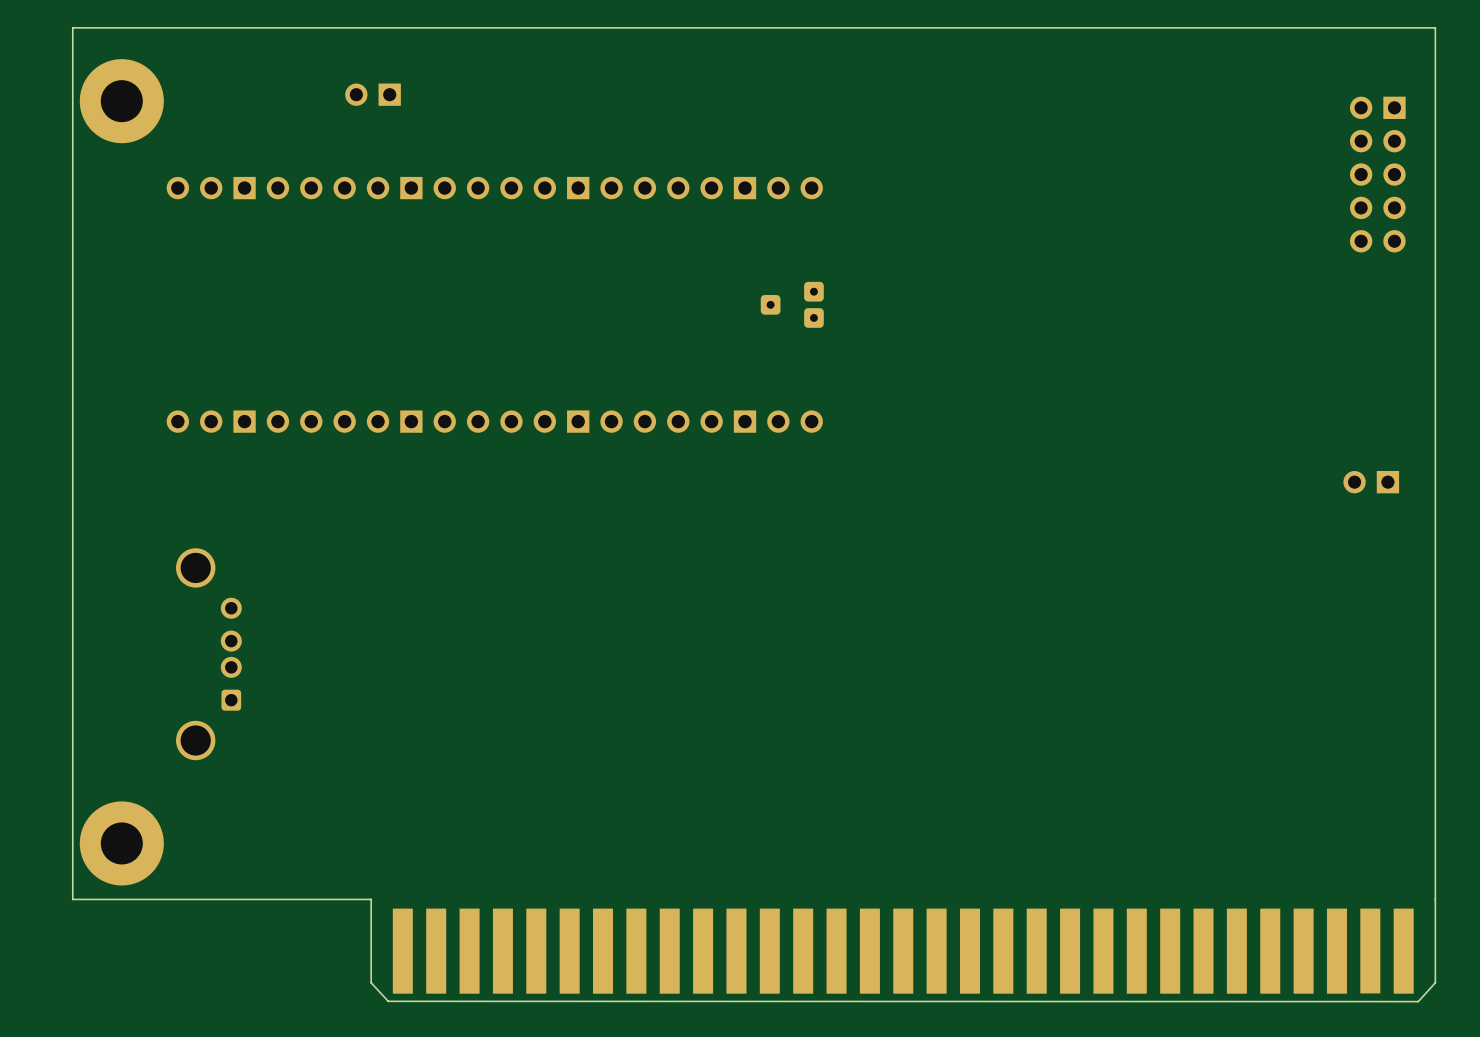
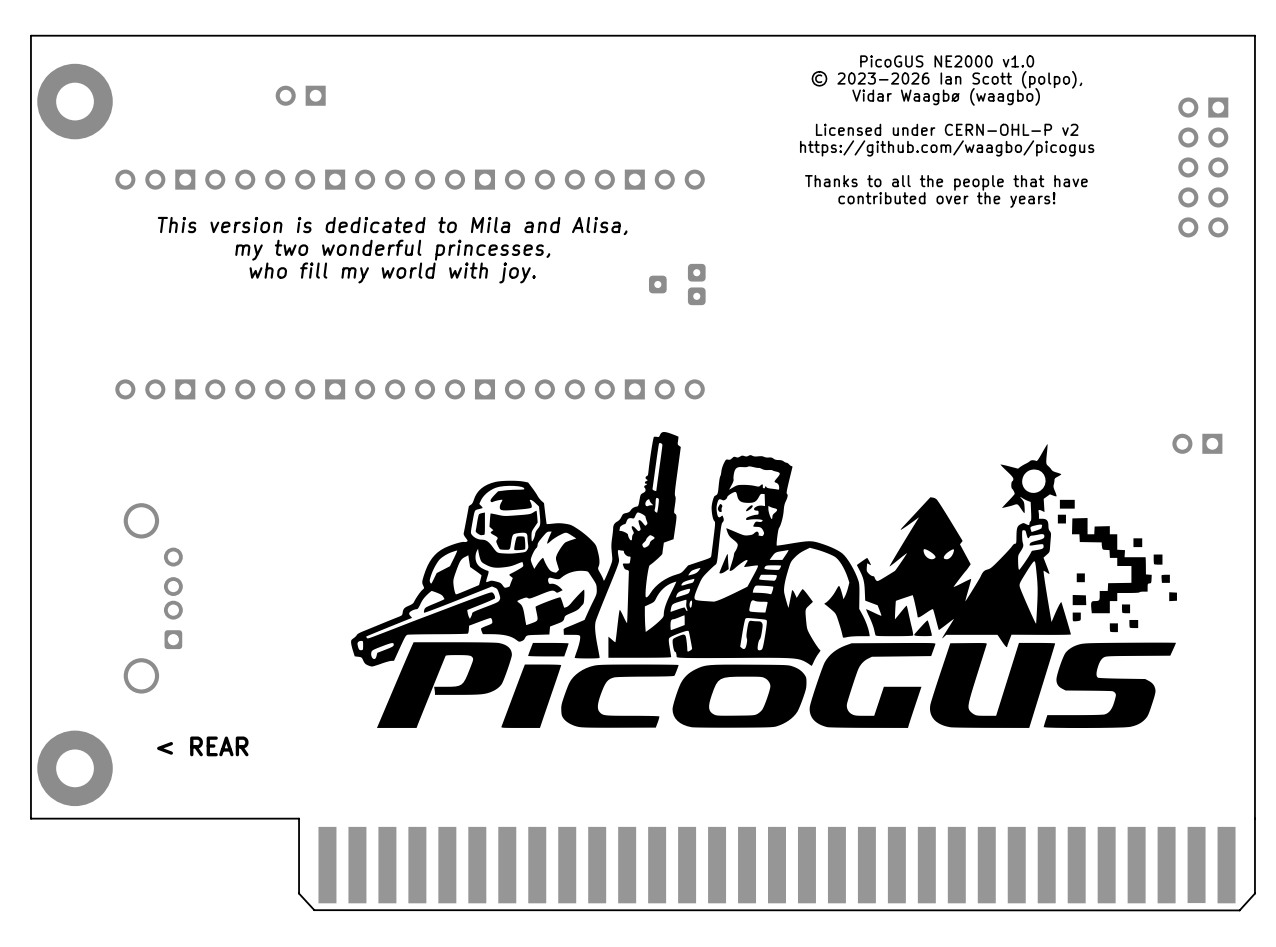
text: none -> PicoGUS NE2000 v1.0 (947, 61)
text: none -> © 2023-2026 Ian Scott (polpo), (946, 79)
text: none -> Vidar Waagbø (waagbo) (946, 96)
text: none -> Licensed under CERN-OHL-P v2 (947, 129)
text: none -> https://github.com/waagbo/picogus (947, 148)
text: none -> Thanks to all the people that have (946, 182)
text: none -> contributed over the years! (946, 199)
text: none -> This version is dedicated to Mila and Alisa, (392, 226)
text: none -> my two wonderful princesses, (392, 250)
text: none -> who fill my world with joy. (392, 272)
drawing: none -> [351, 432, 1177, 729]
text: none -> < REAR (202, 746)

